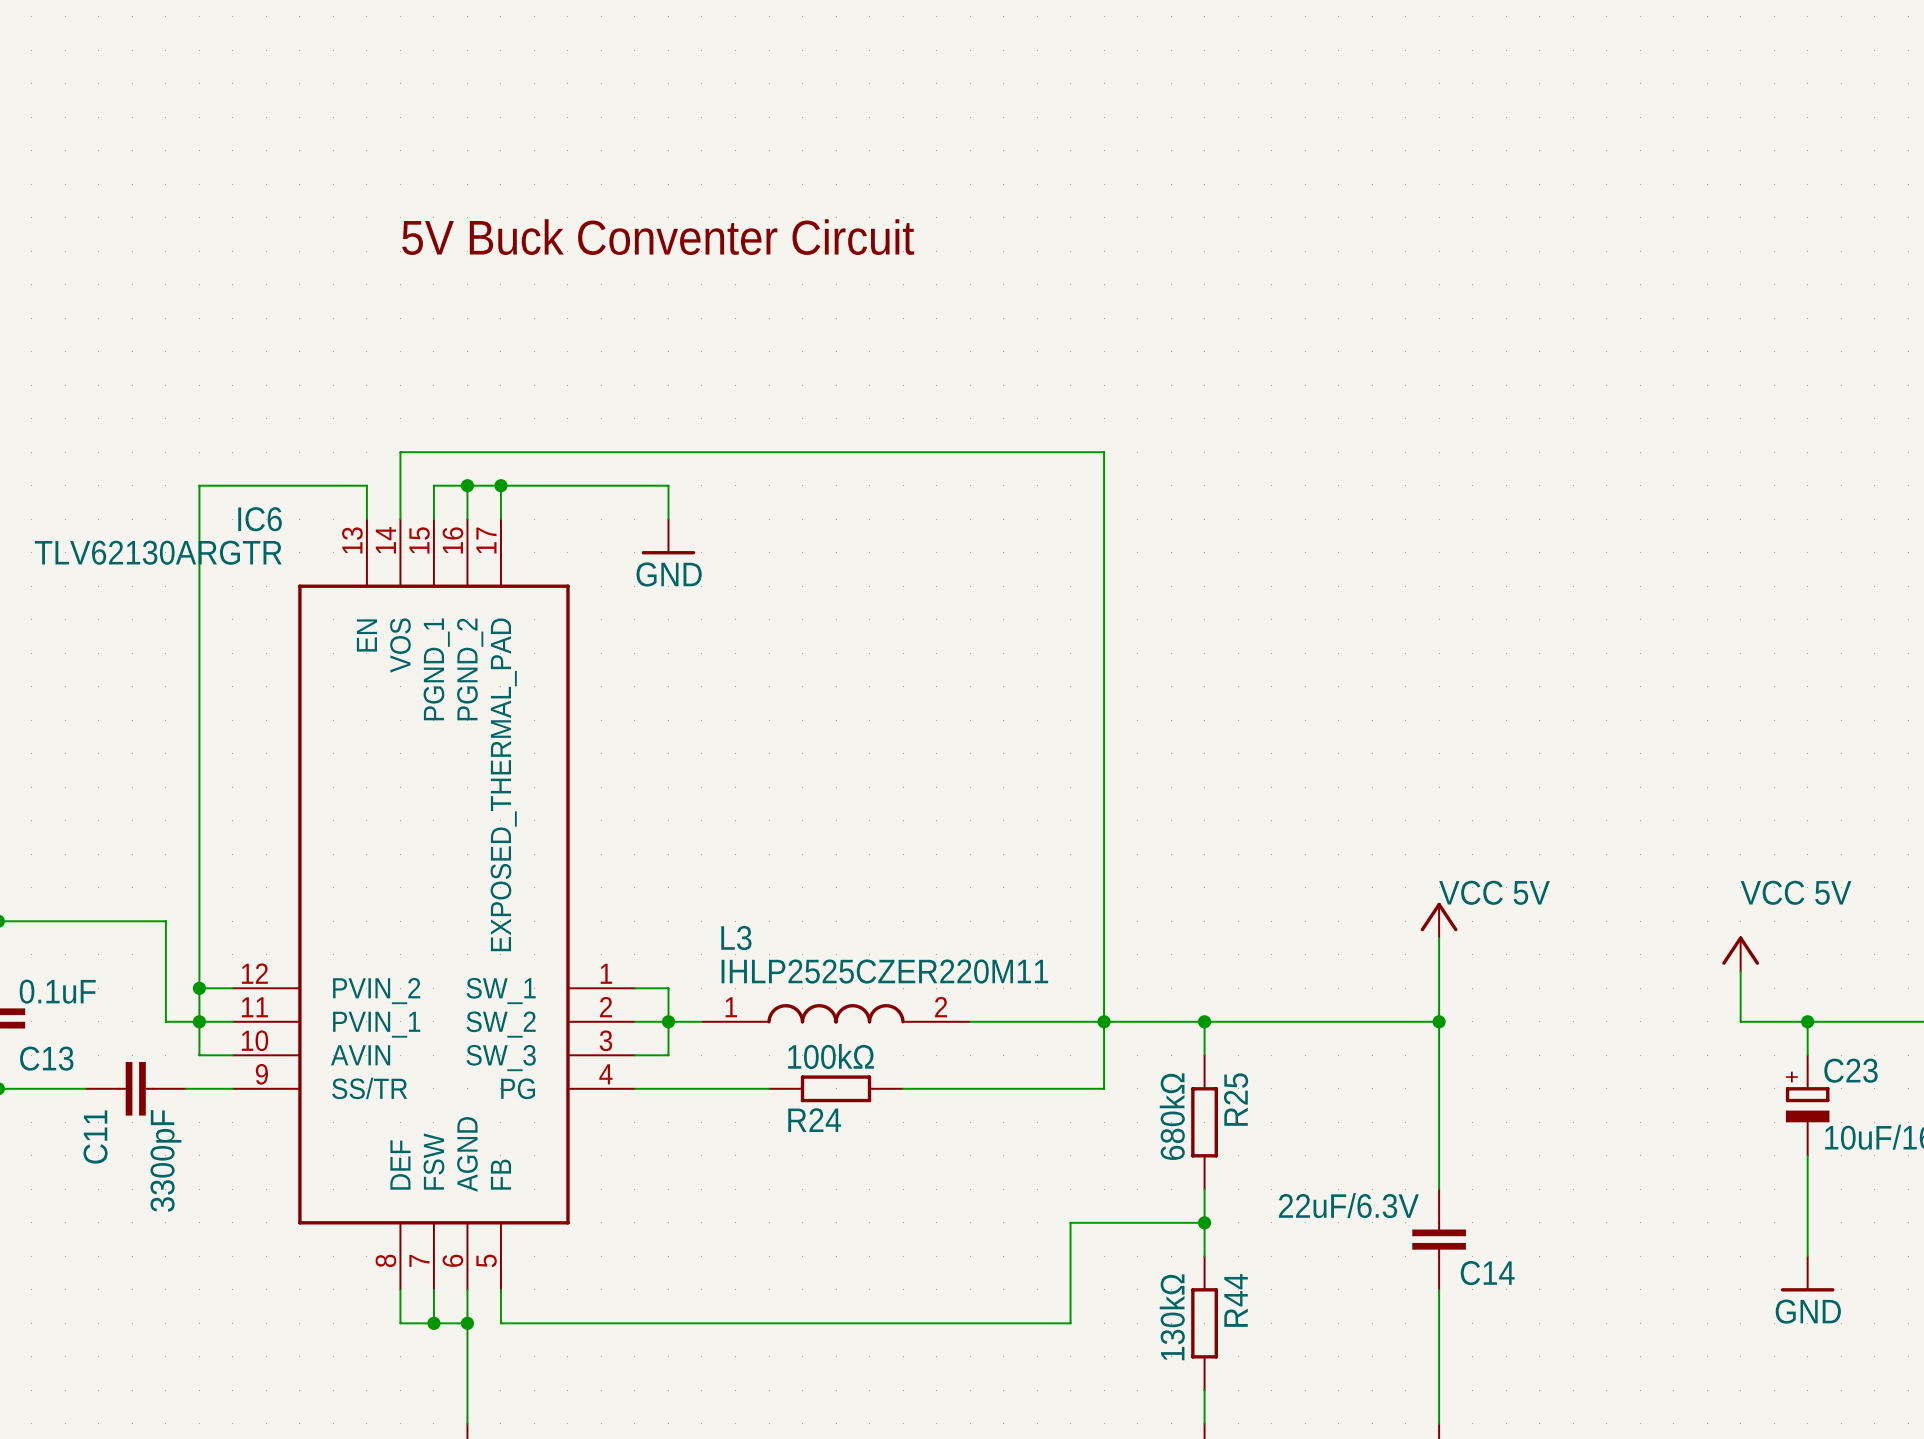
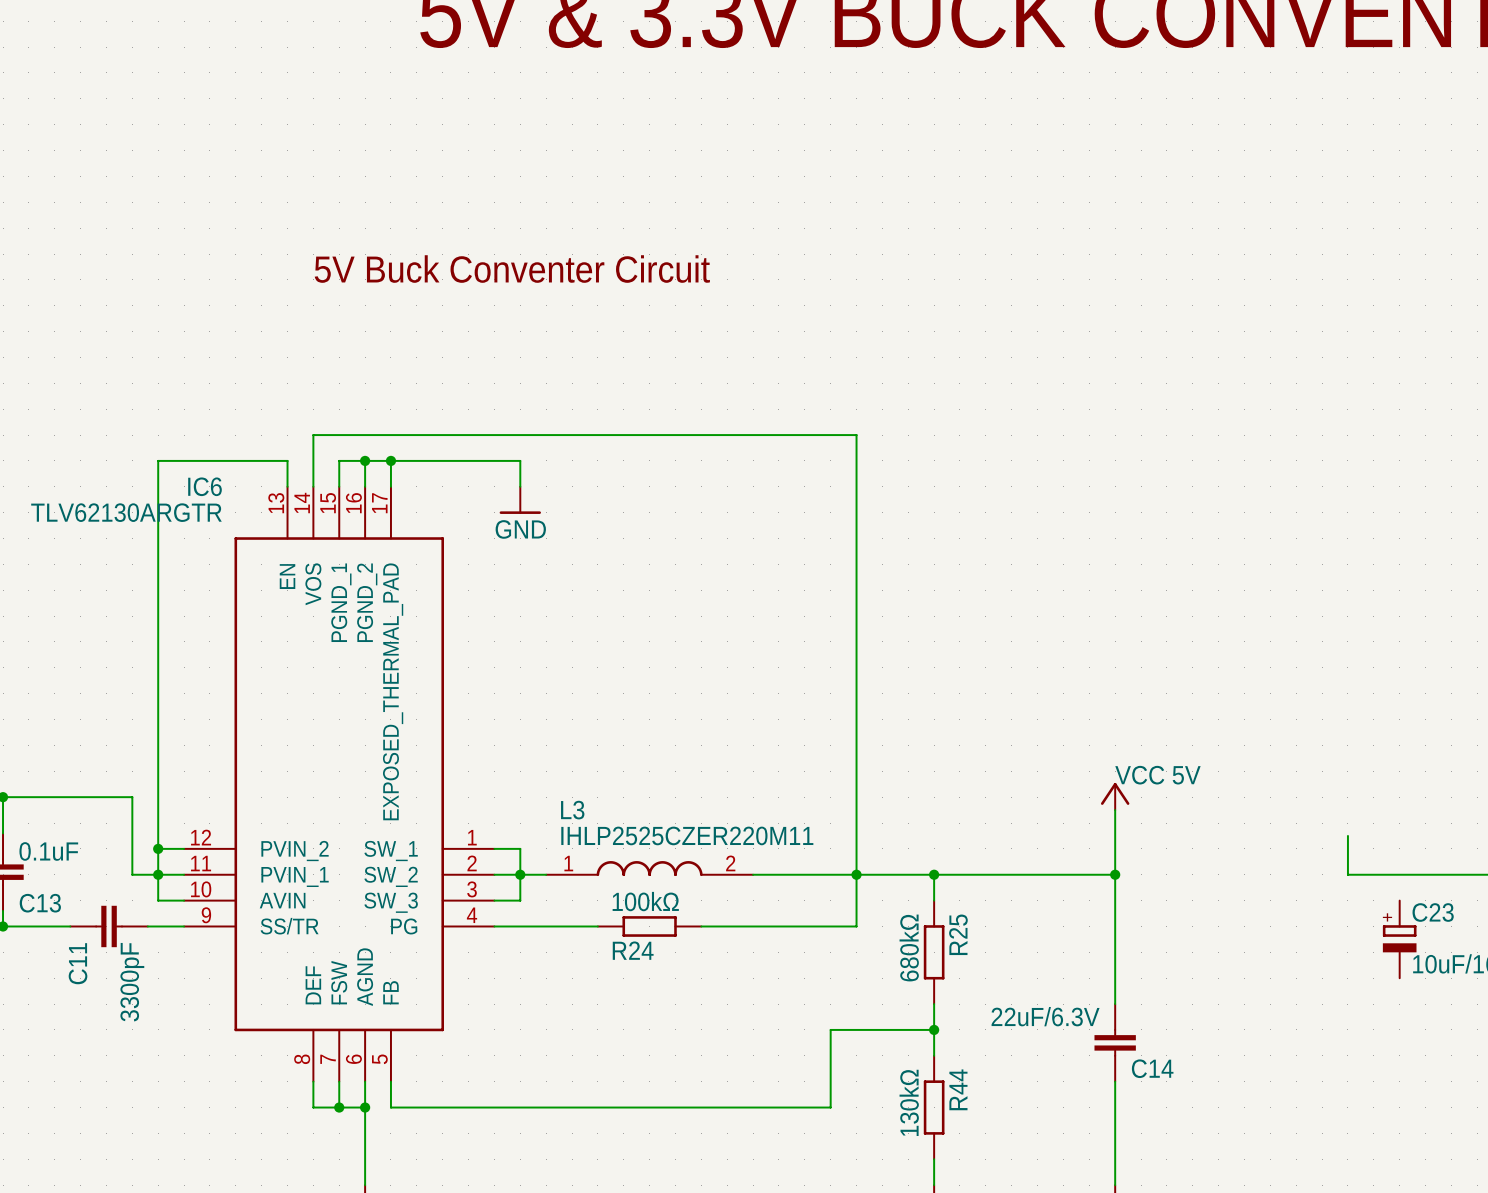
power symbol: VCC 5V (1740, 953) -> none
wire: (1807, 1021) (1807, 1055) -> none
junction: (1807, 1021) -> none
wire: (1807, 1155) (1807, 1256) -> none
power symbol: GND (1807, 1273) -> none

